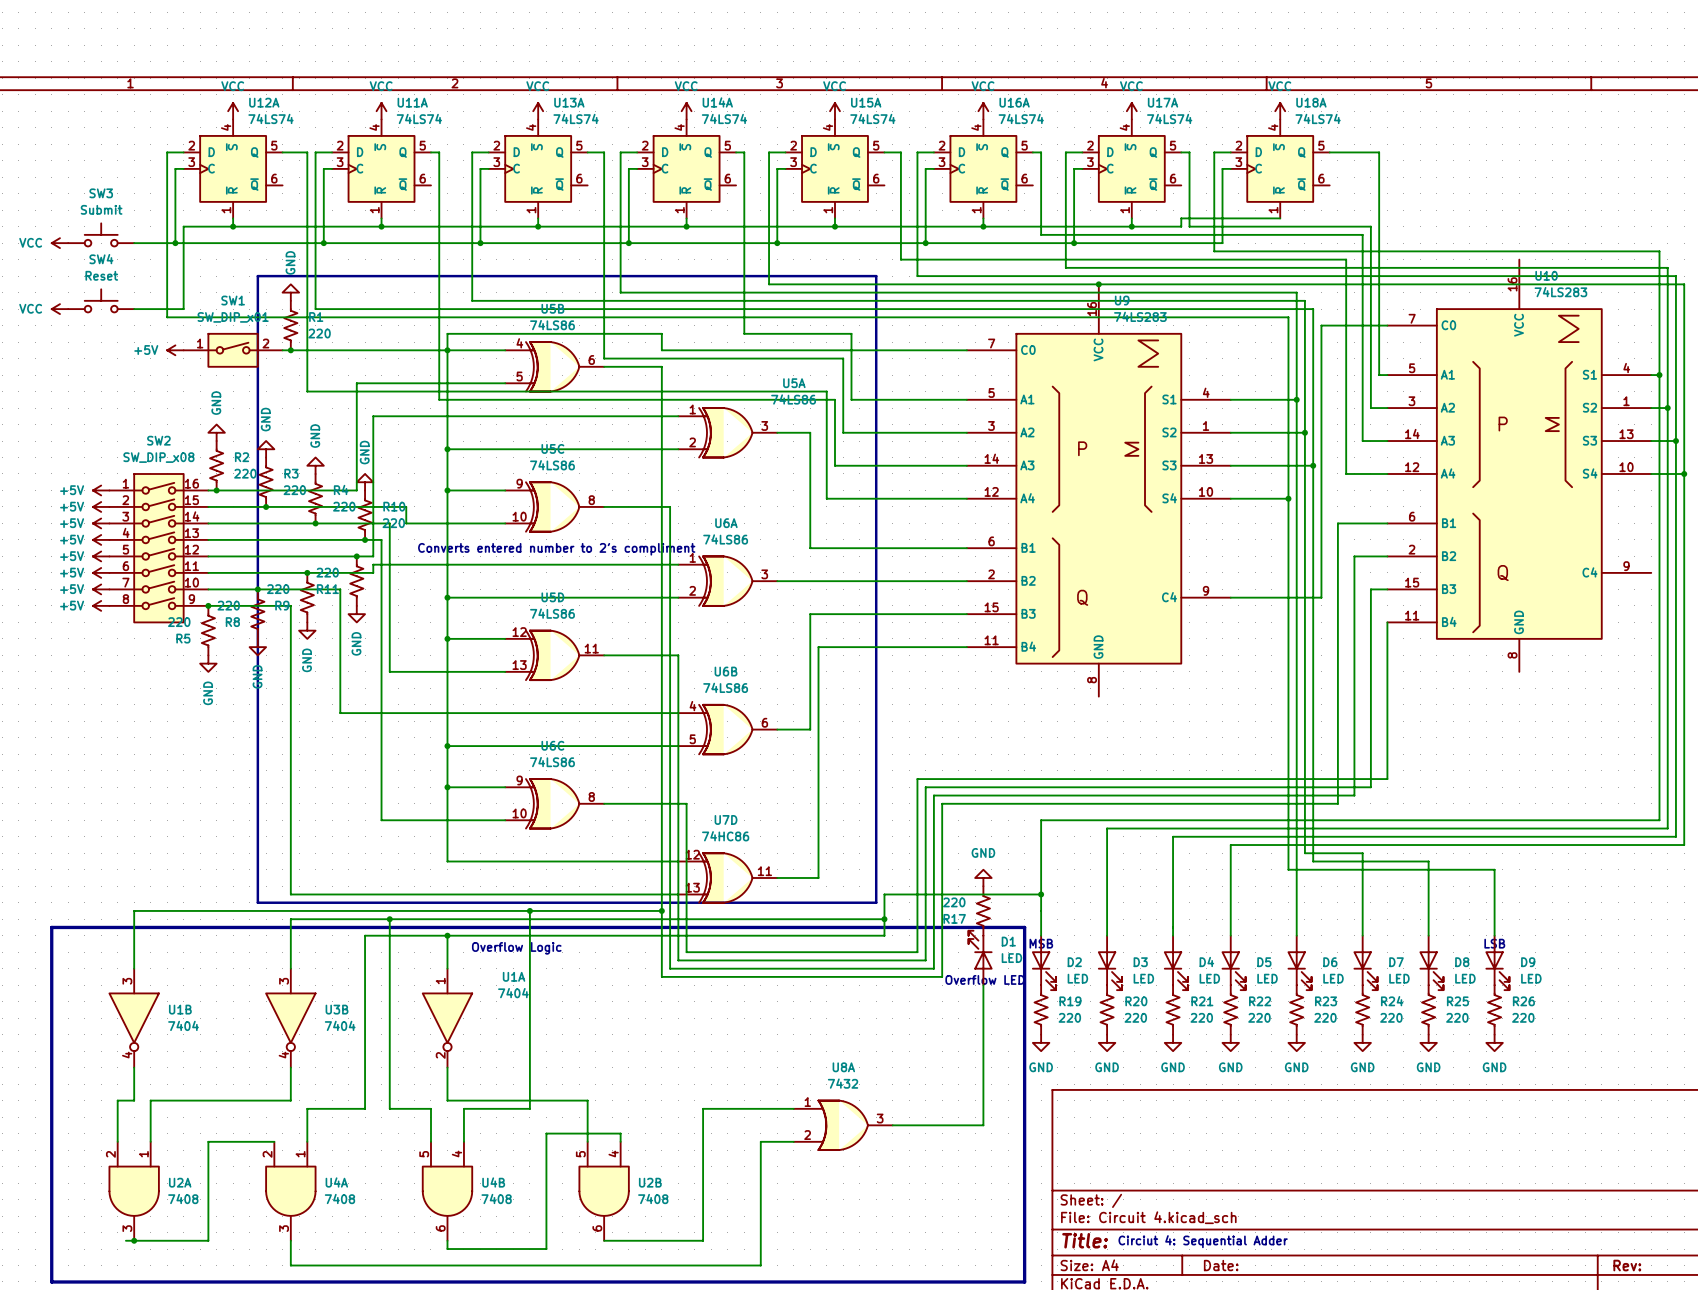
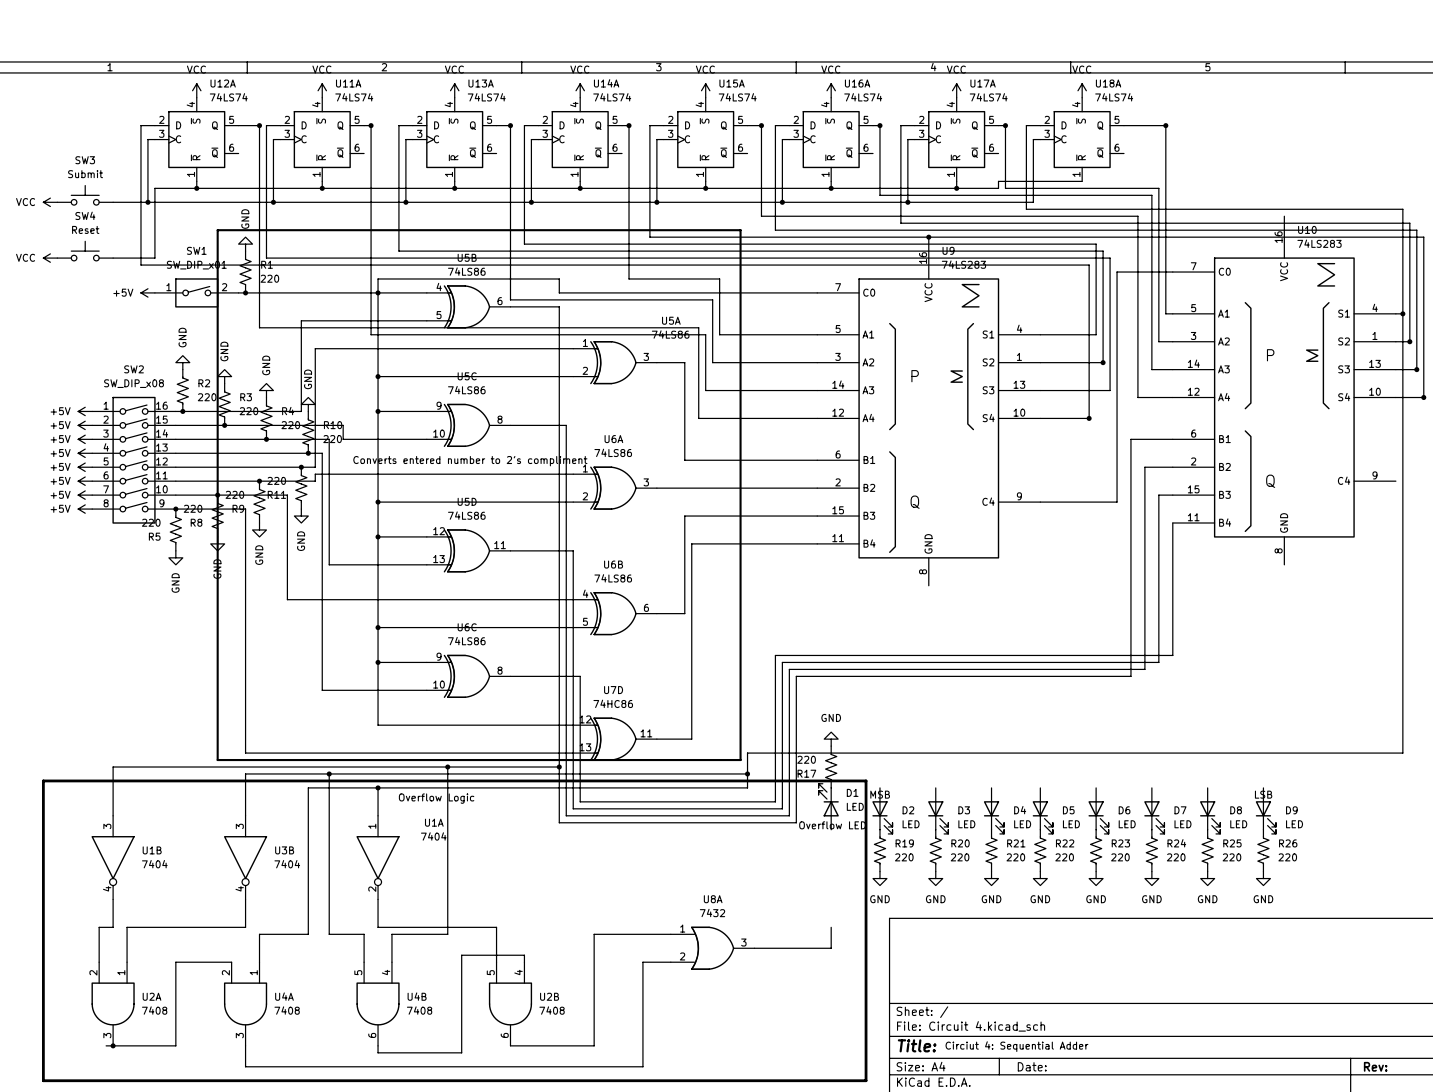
junction: none -> (259, 125)
junction: none -> (371, 125)
junction: none -> (510, 125)
junction: none -> (629, 125)
junction: none -> (761, 125)
junction: none -> (879, 125)
junction: none -> (1005, 125)
junction: none -> (1165, 125)
wire: (1296, 399) (1296, 935) -> none
junction: (1296, 399) -> none
wire: (1667, 408) (1667, 828) (1107, 828) (1107, 935) -> none
wire: (1304, 432) (1304, 853) (1362, 853) (1362, 935) -> none
wire: (1675, 441) (1675, 836) (1173, 836) (1173, 935) -> none
wire: (1313, 465) (1313, 861) (1428, 861) (1428, 935) -> none
junction: (1313, 465) -> none
wire: (1684, 473) (1684, 845) (1230, 845) (1230, 935) -> none
wire: (1288, 498) (1288, 869) (1494, 869) (1494, 935) -> none
wire: (1659, 820) (1041, 820) (1041, 935) -> (1402, 690) (1402, 753) (879, 753)
junction: (1041, 894) -> none
wire: (983, 985) (983, 1100) -> none

